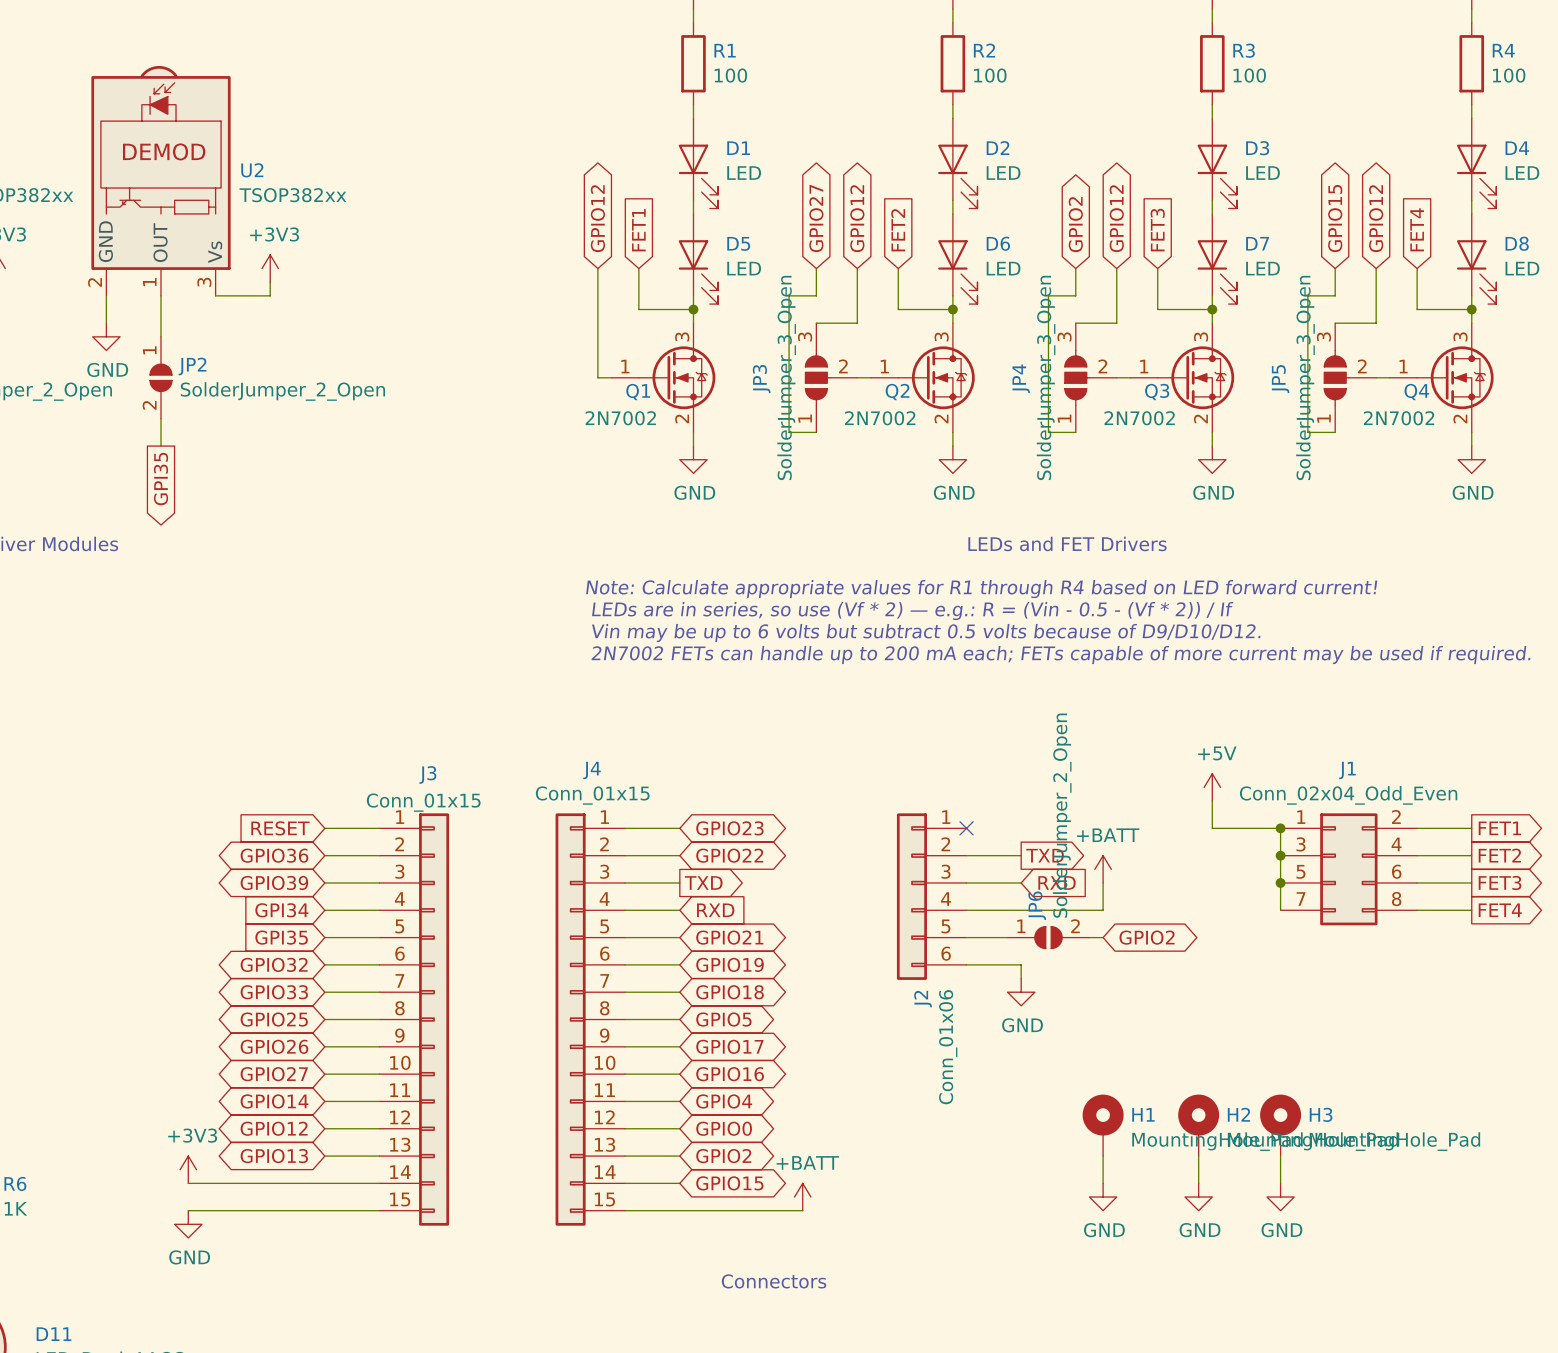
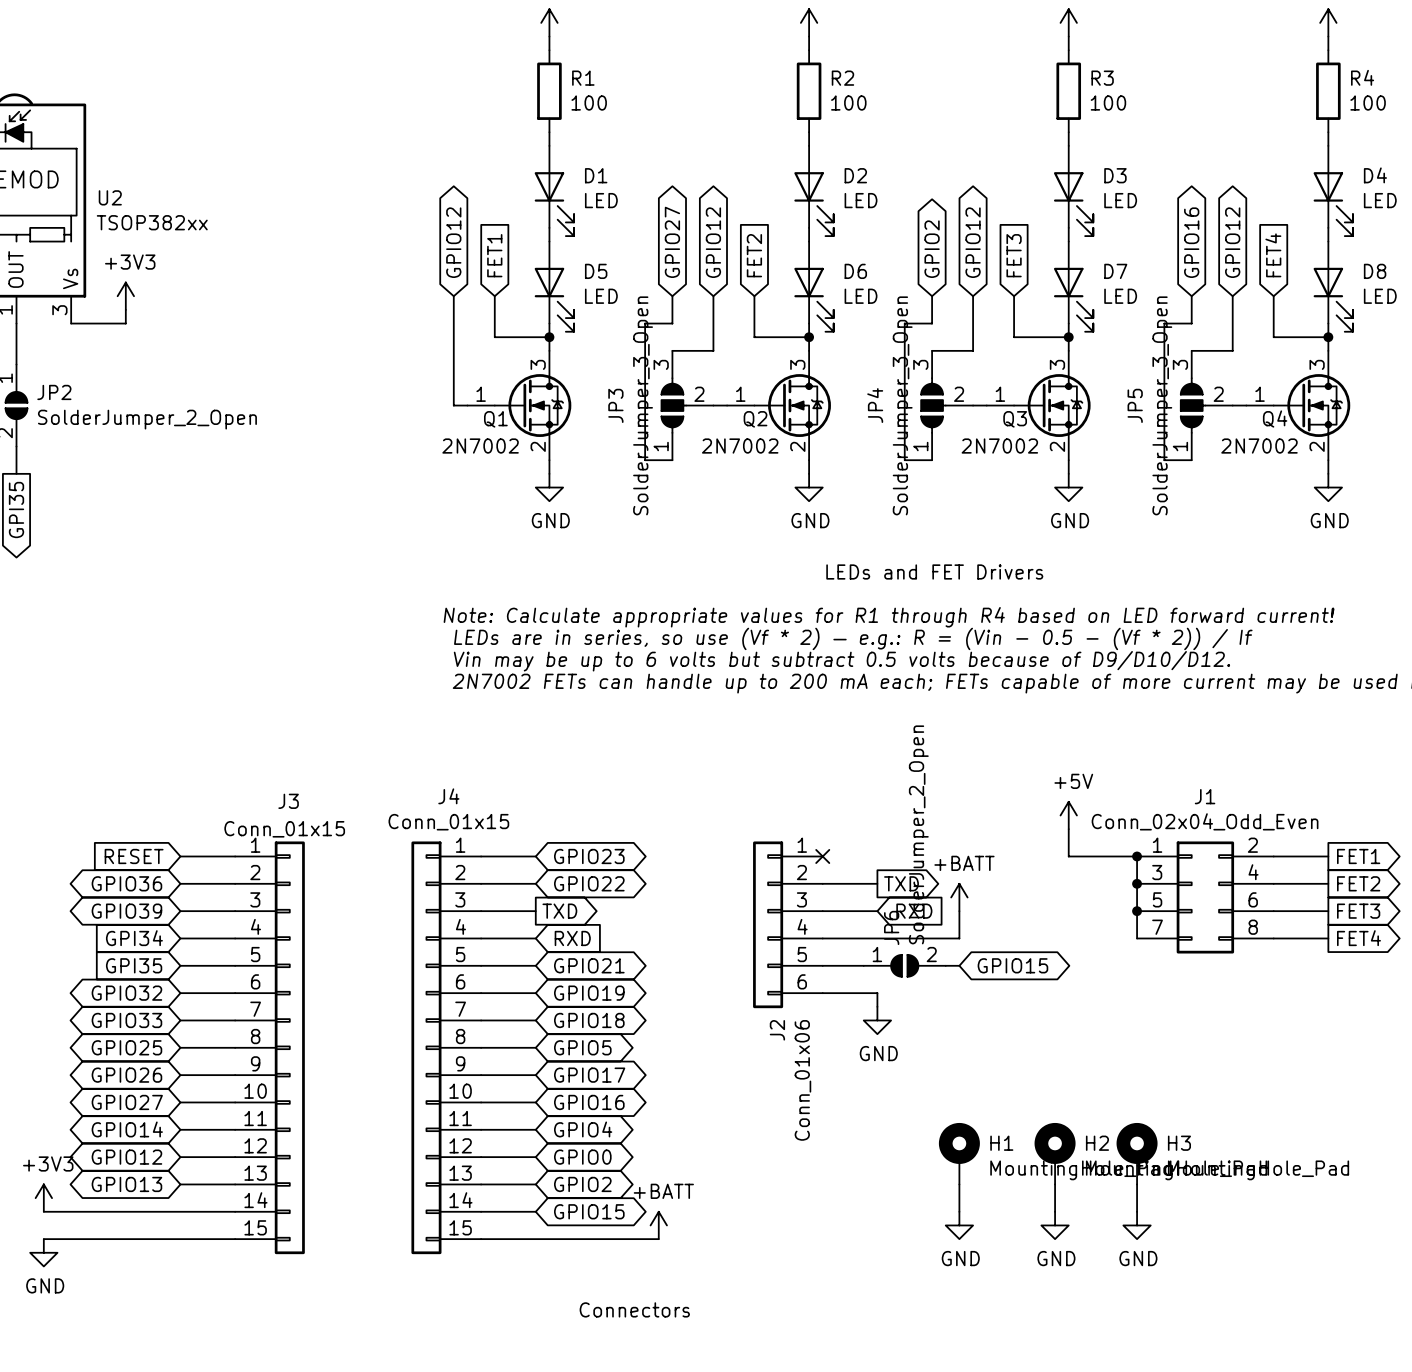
global label: GPIO15 (1335, 218) -> GPIO16 (1191, 242)
global label: GPIO2 (1147, 937) -> GPIO15 (1012, 965)

